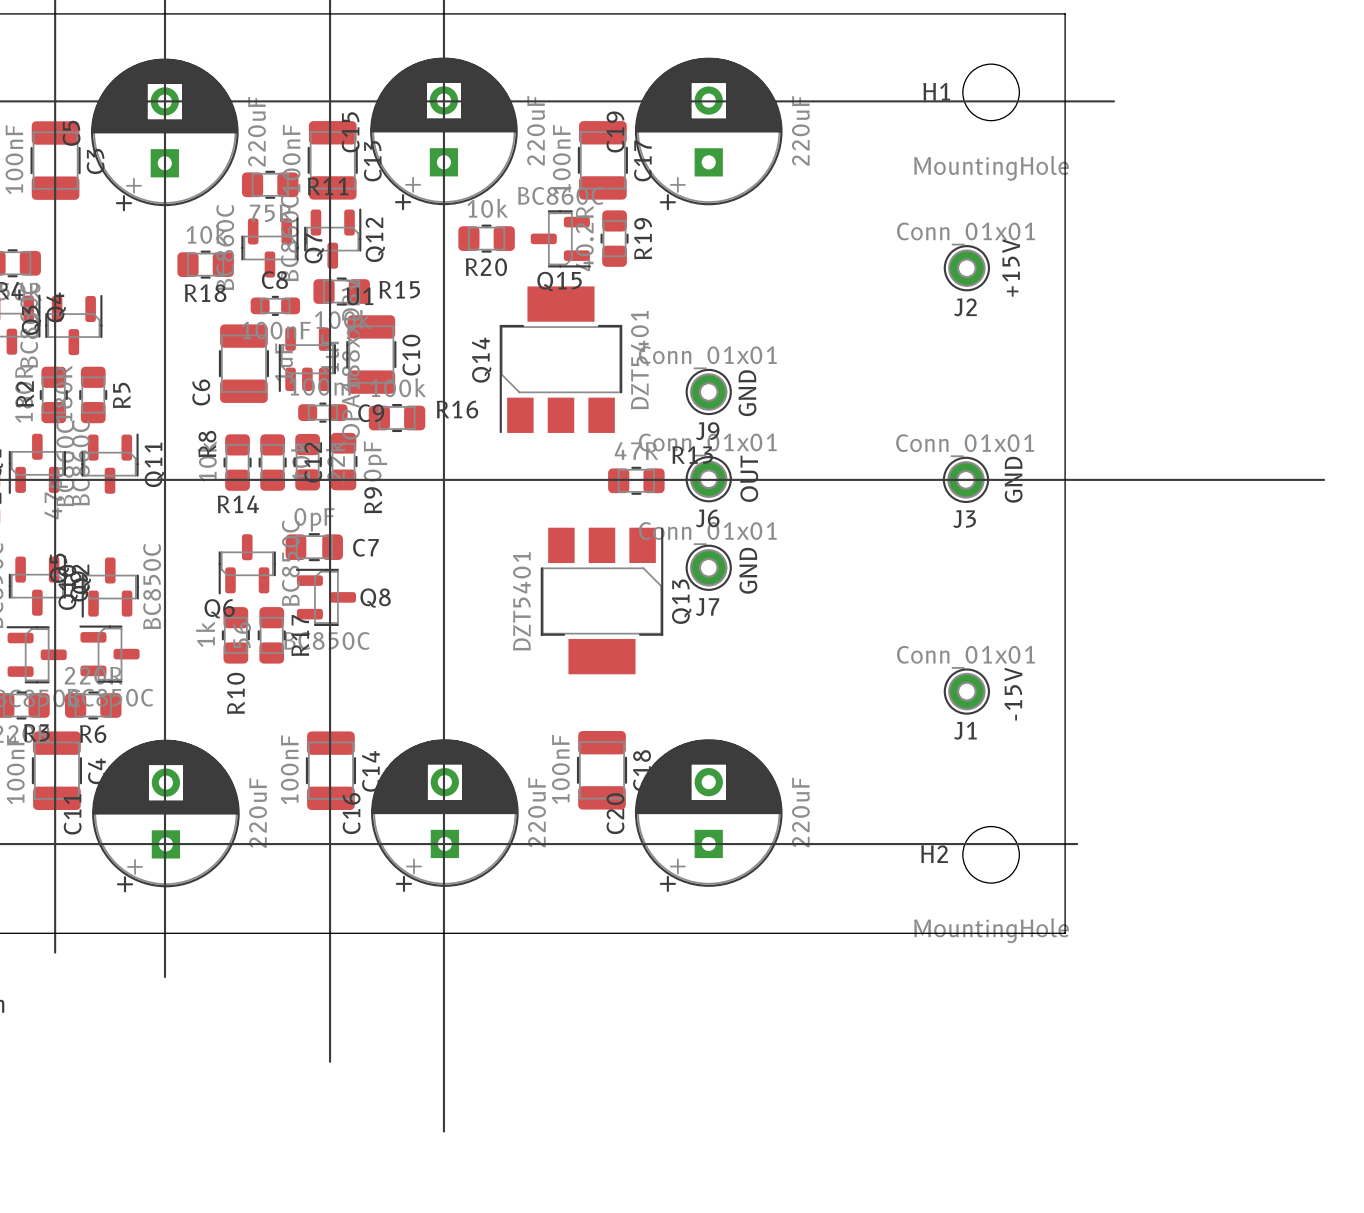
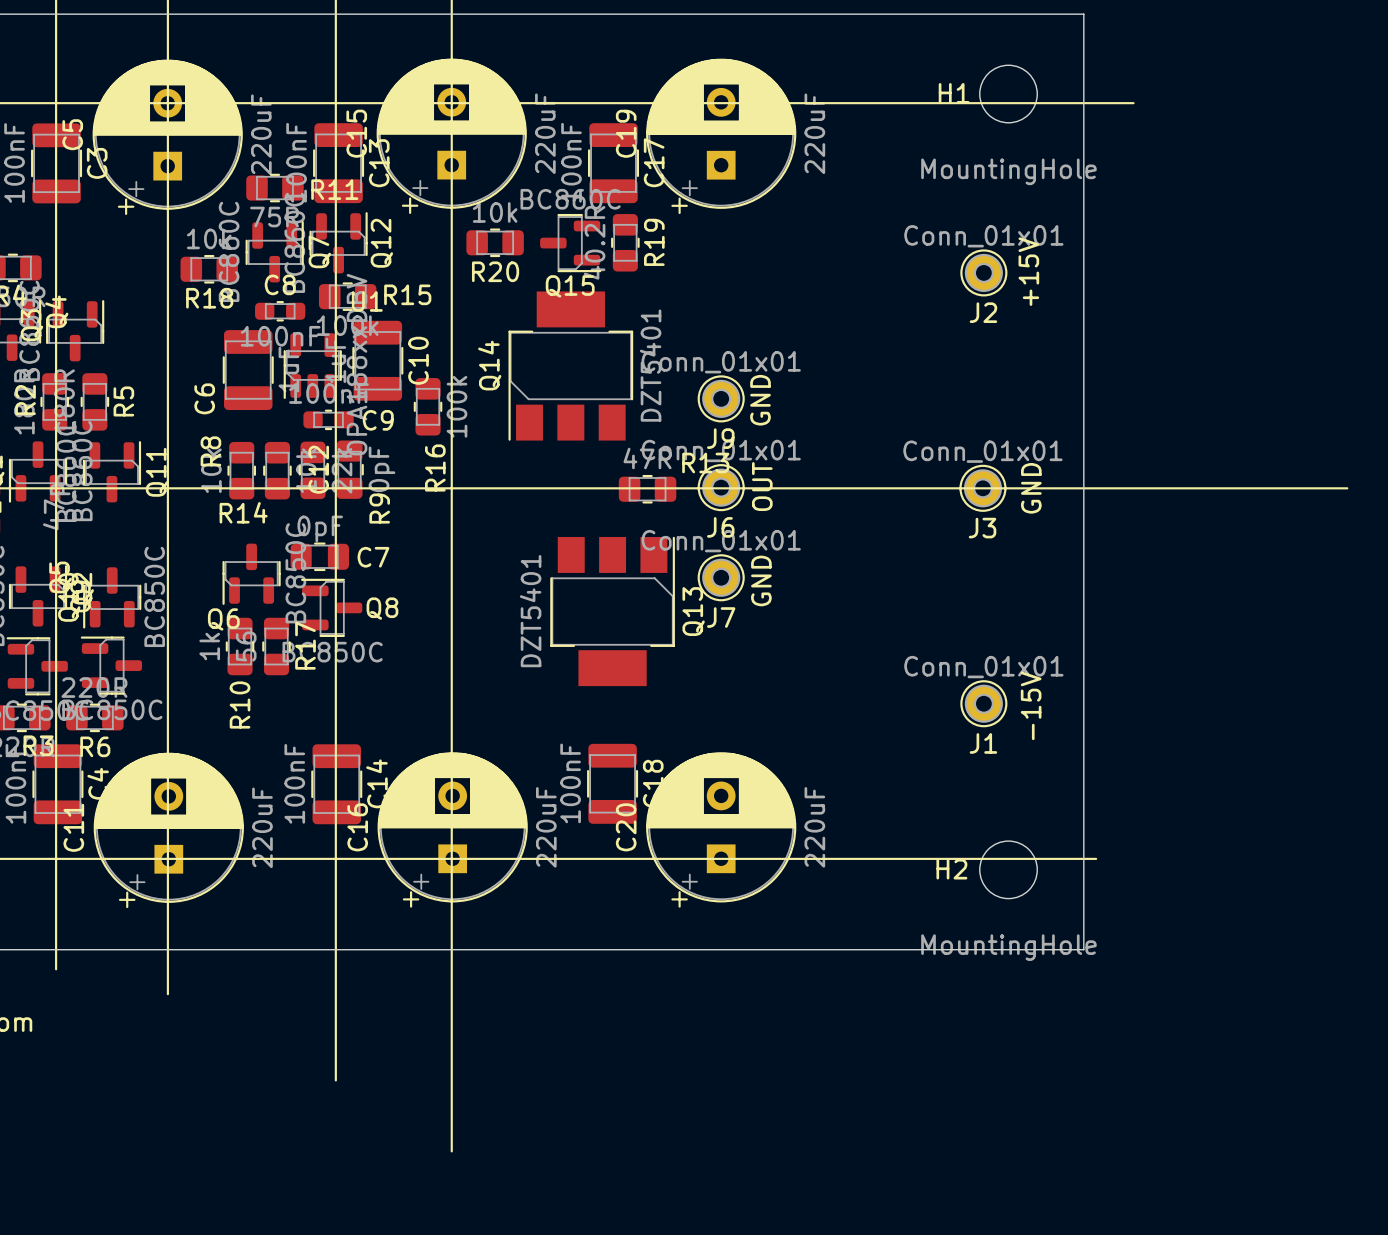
R16 rotation: 0° (397, 418) -> 90° clockwise (428, 406)

